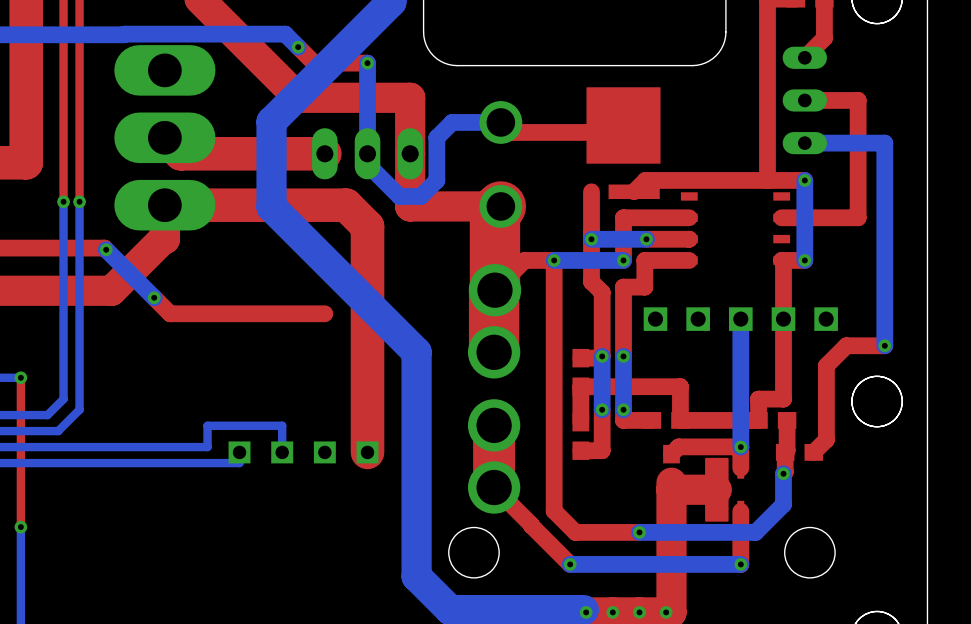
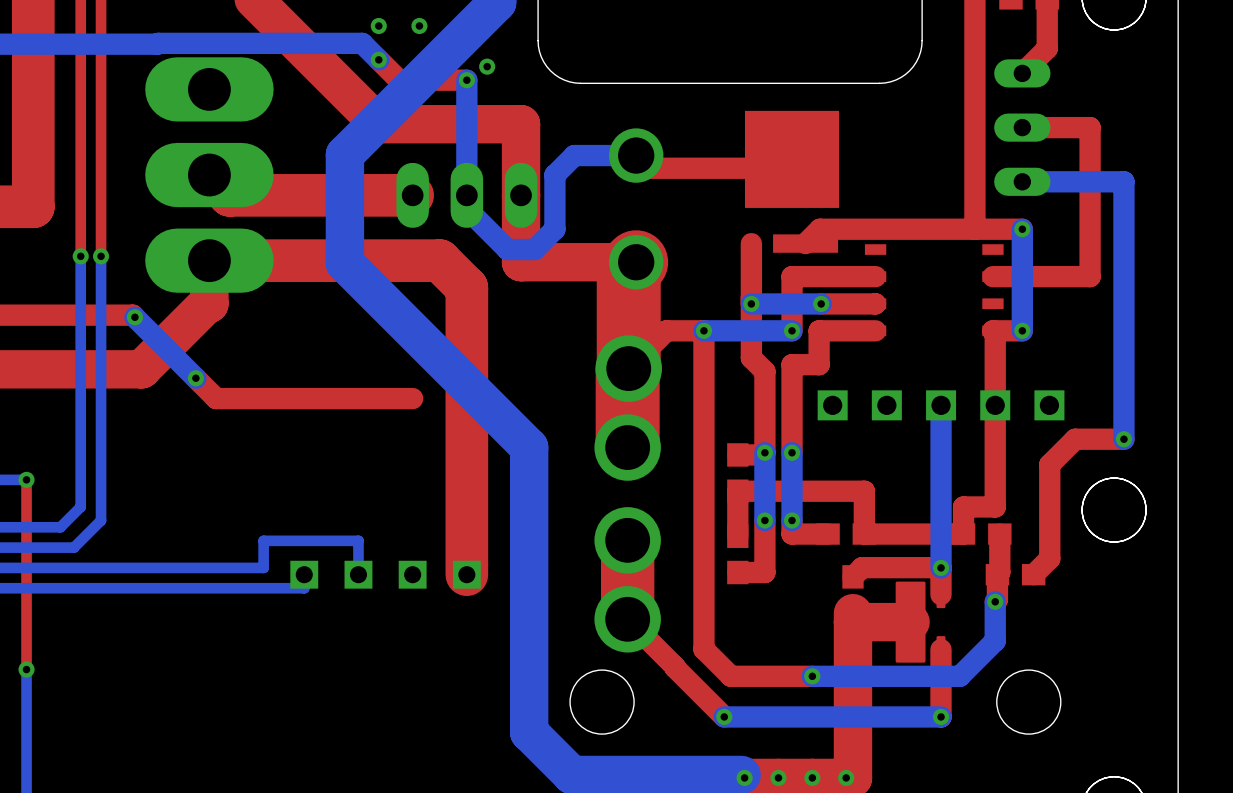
via: none -> (378, 25)
via: none -> (419, 25)
via: none -> (487, 66)

